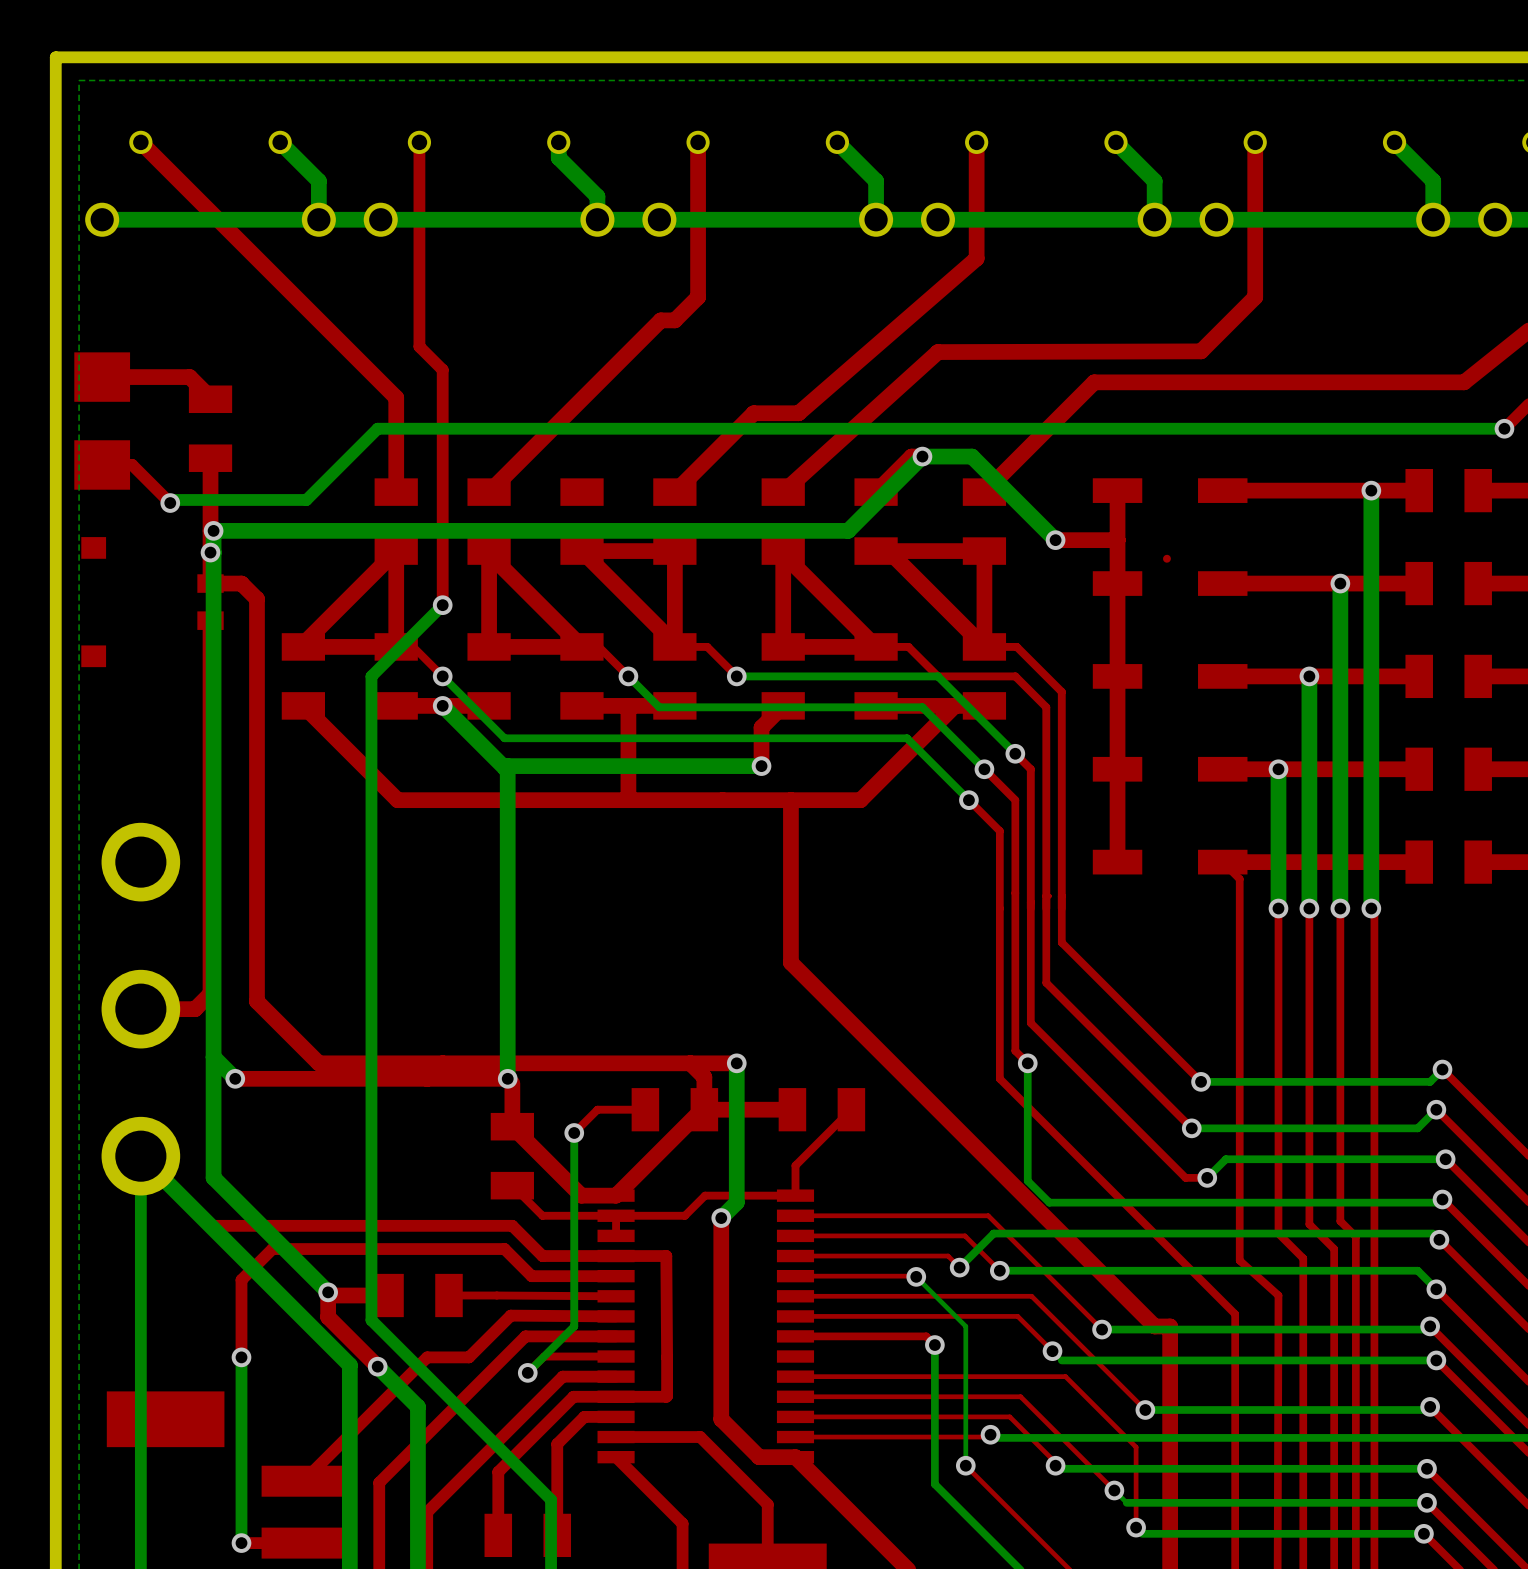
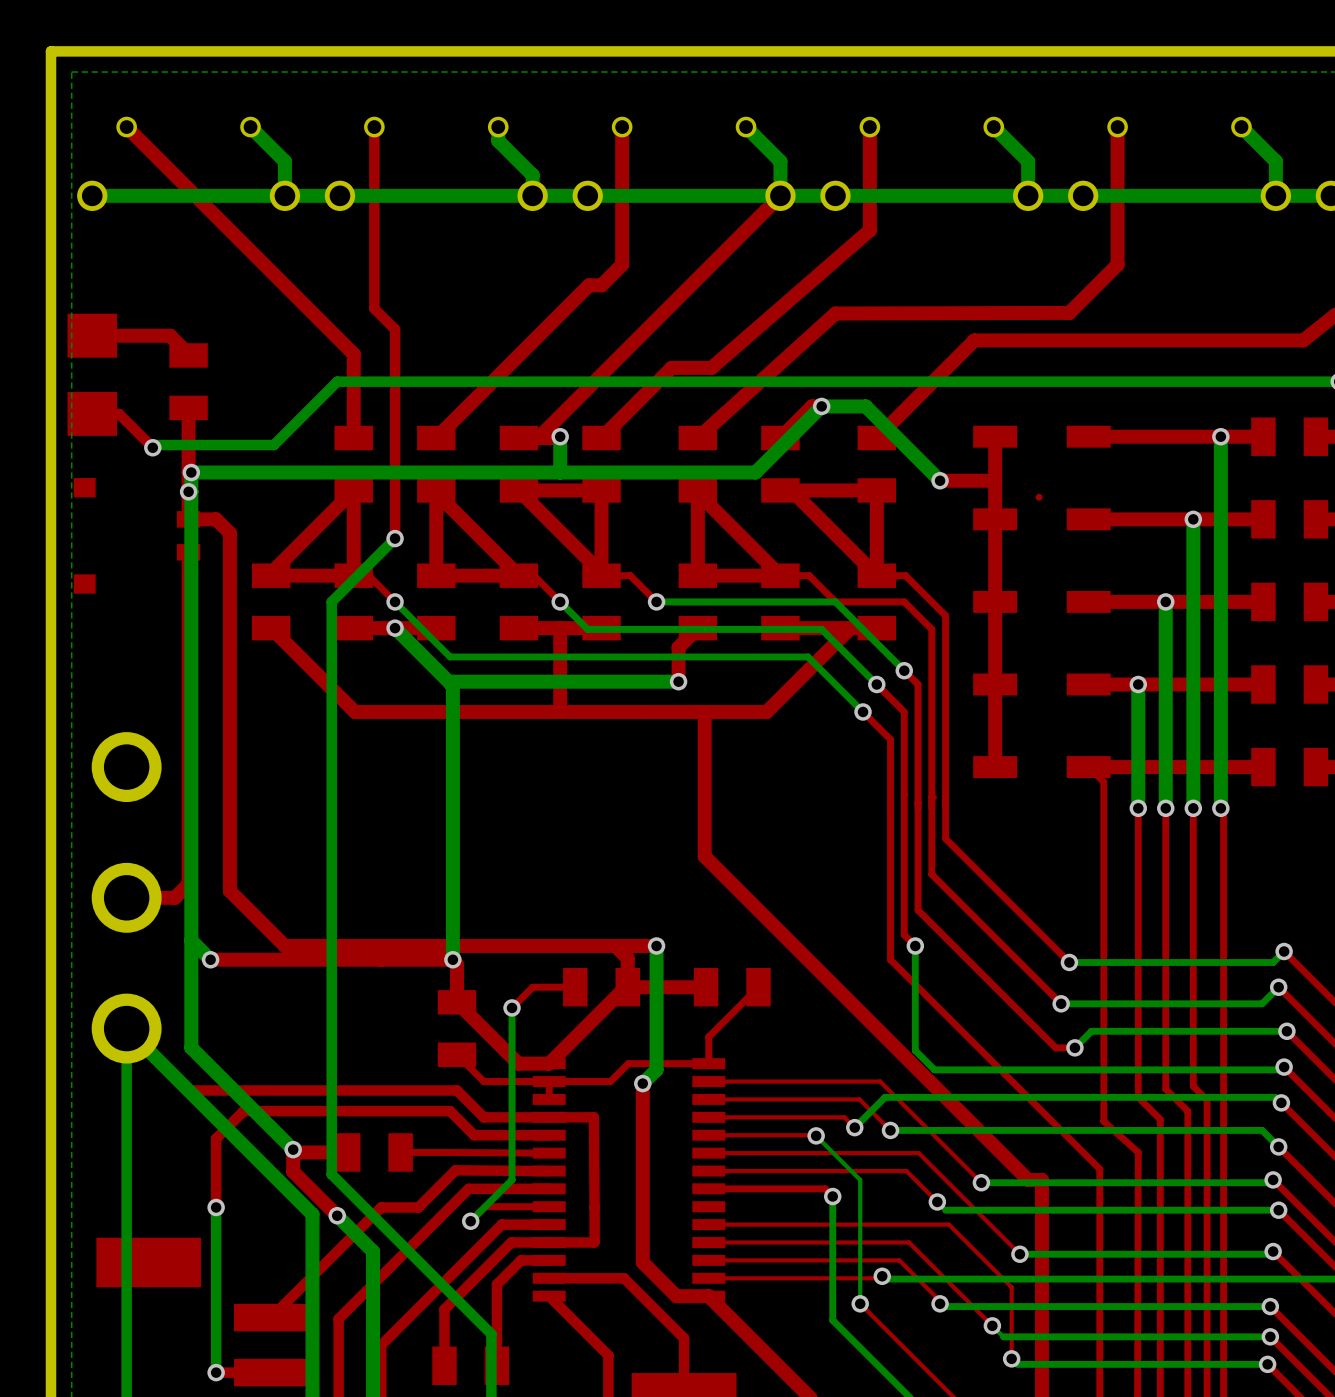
top track: none -> (780, 195) (538, 438) (518, 438) (558, 438) (560, 436)
bottom track: none -> (560, 436) (560, 472)
via: none -> (560, 436)

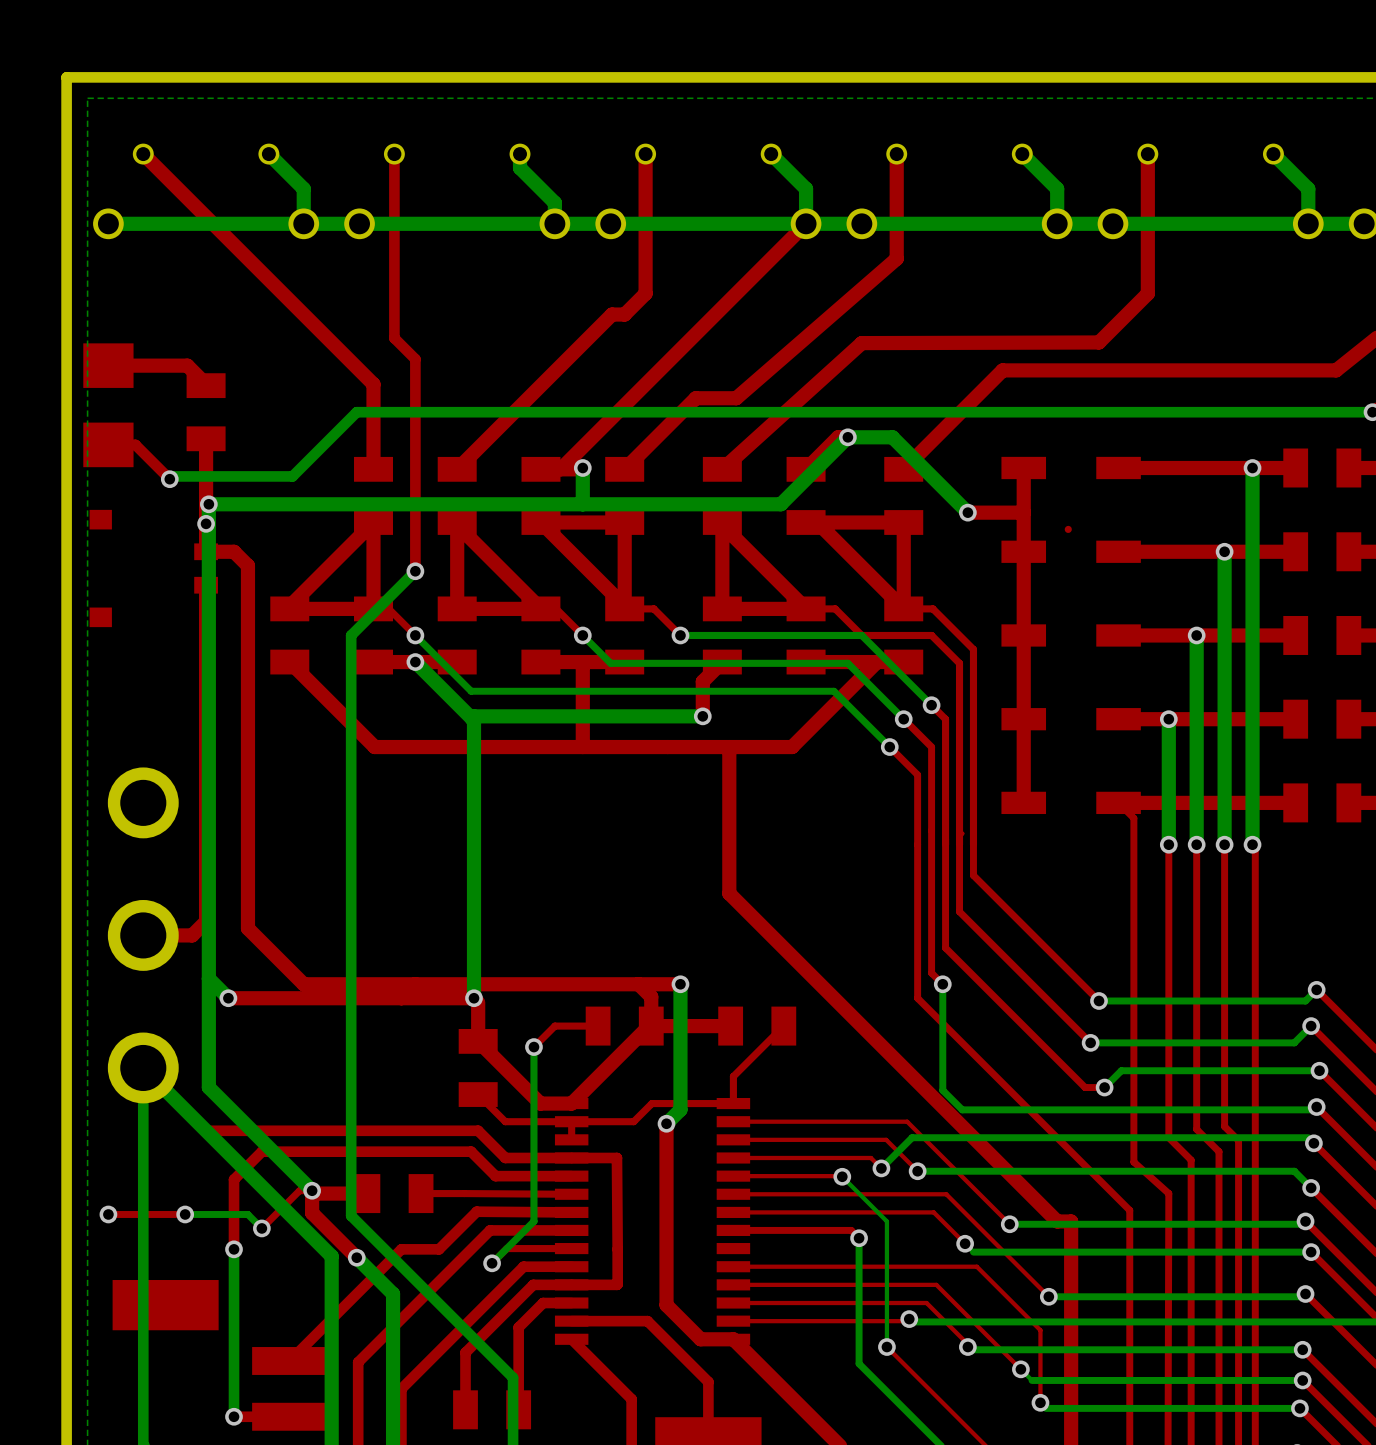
top track: none -> (312, 1190) (299, 1190) (261, 1228)
via: none -> (108, 1214)
top track: none -> (185, 1214) (108, 1214)
bottom track: none -> (185, 1214) (247, 1214) (261, 1228)
via: none -> (185, 1214)
via: none -> (261, 1228)

